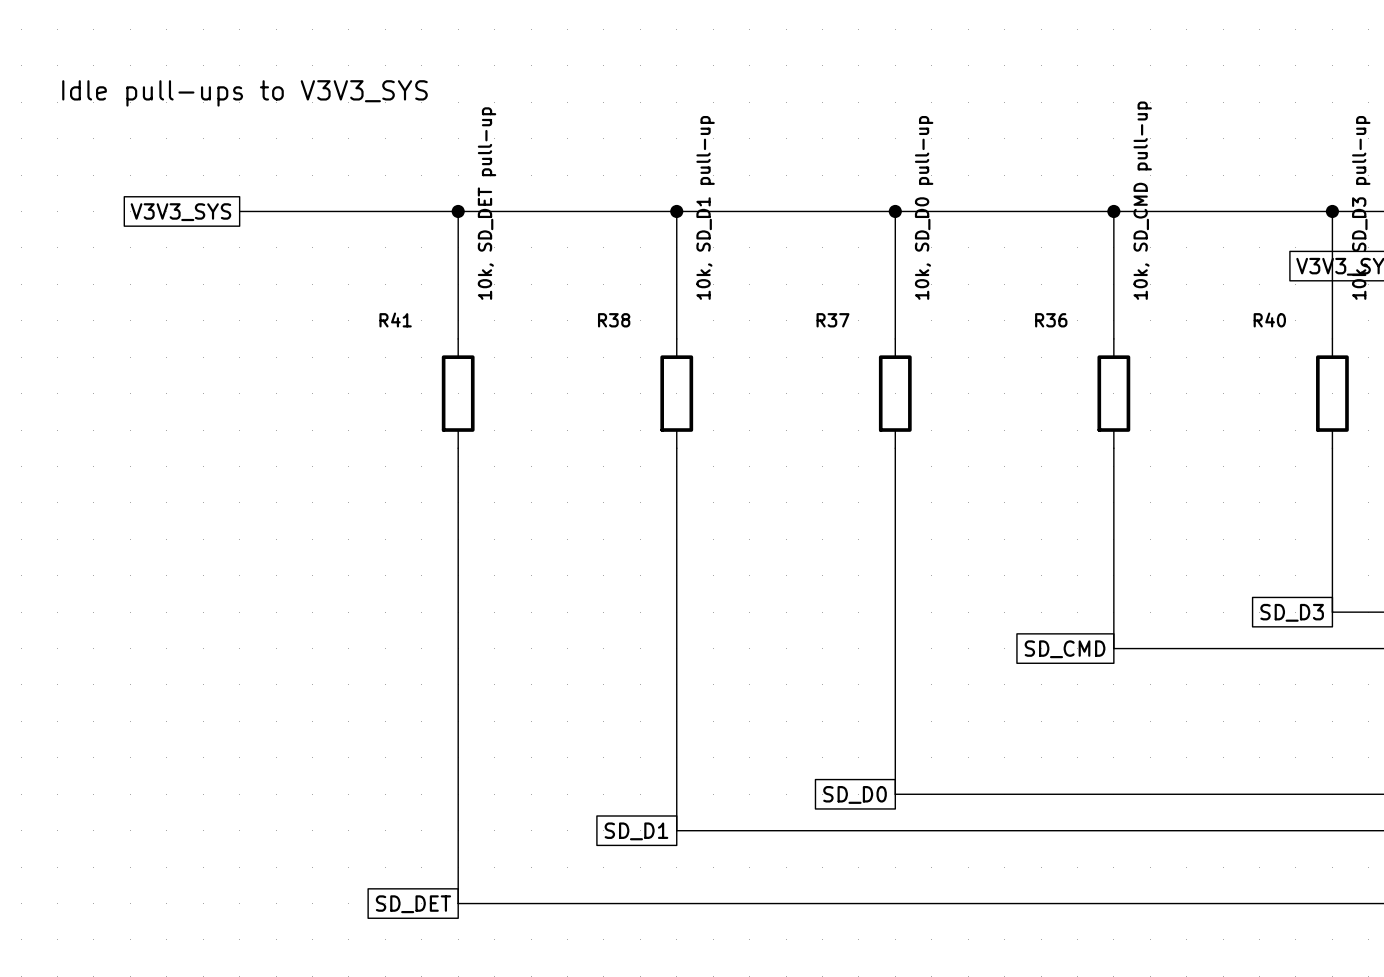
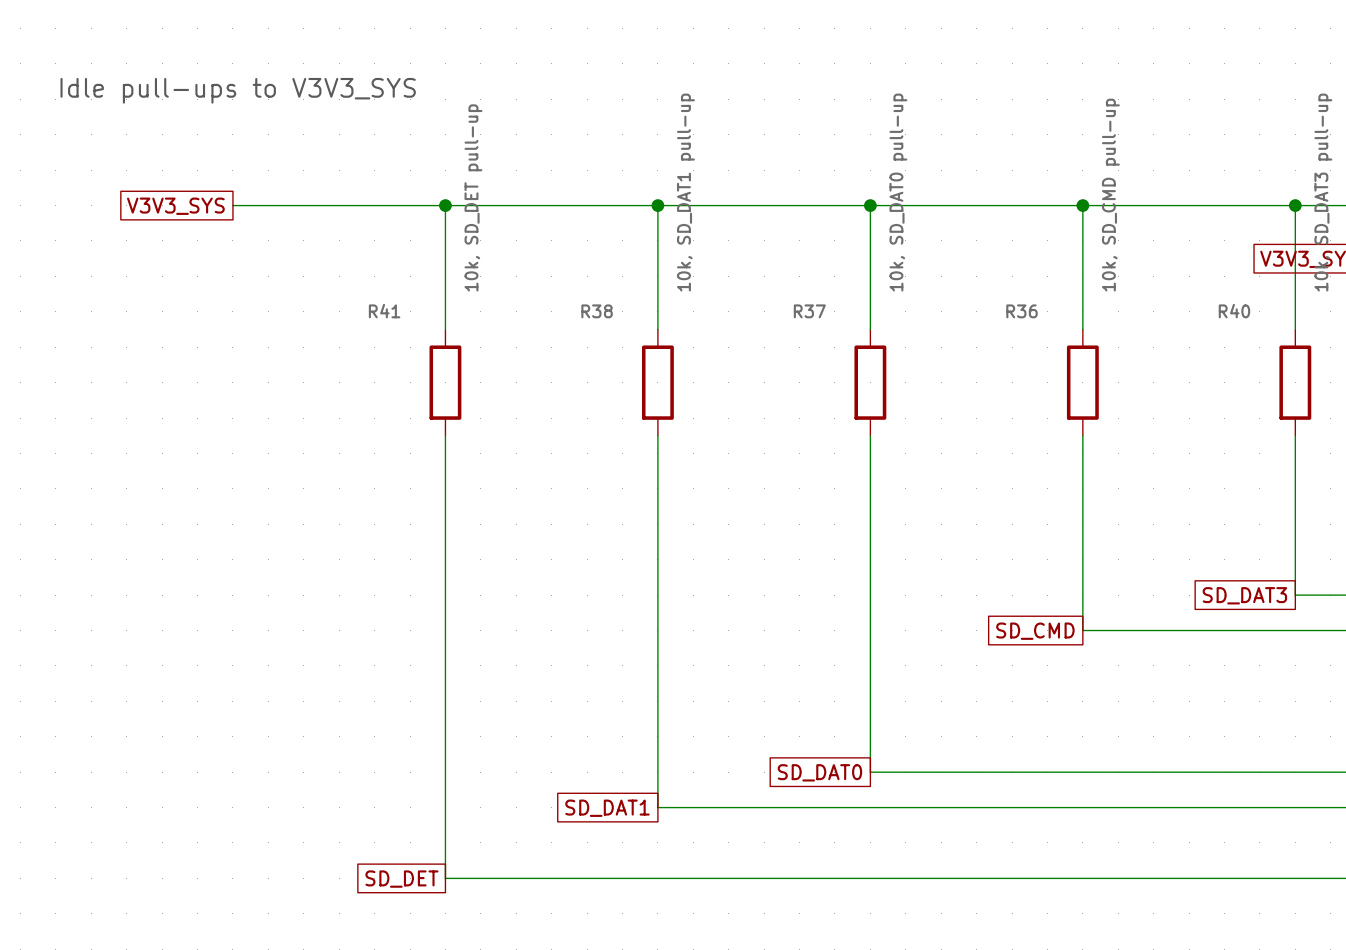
R38 value: 10k, SD_D1 pull-up (705, 207) -> 10k, SD_DAT1 pull-up (685, 192)
R37 value: 10k, SD_D0 pull-up (924, 207) -> 10k, SD_DAT0 pull-up (898, 192)
R40 value: 10k, SD_D3 pull-up (1361, 207) -> 10k, SD_DAT3 pull-up (1323, 192)
global label: SD_D3 (1292, 612) -> SD_DAT3 (1244, 595)
global label: SD_D0 (855, 794) -> SD_DAT0 (819, 772)
global label: SD_D1 (636, 831) -> SD_DAT1 (607, 808)

